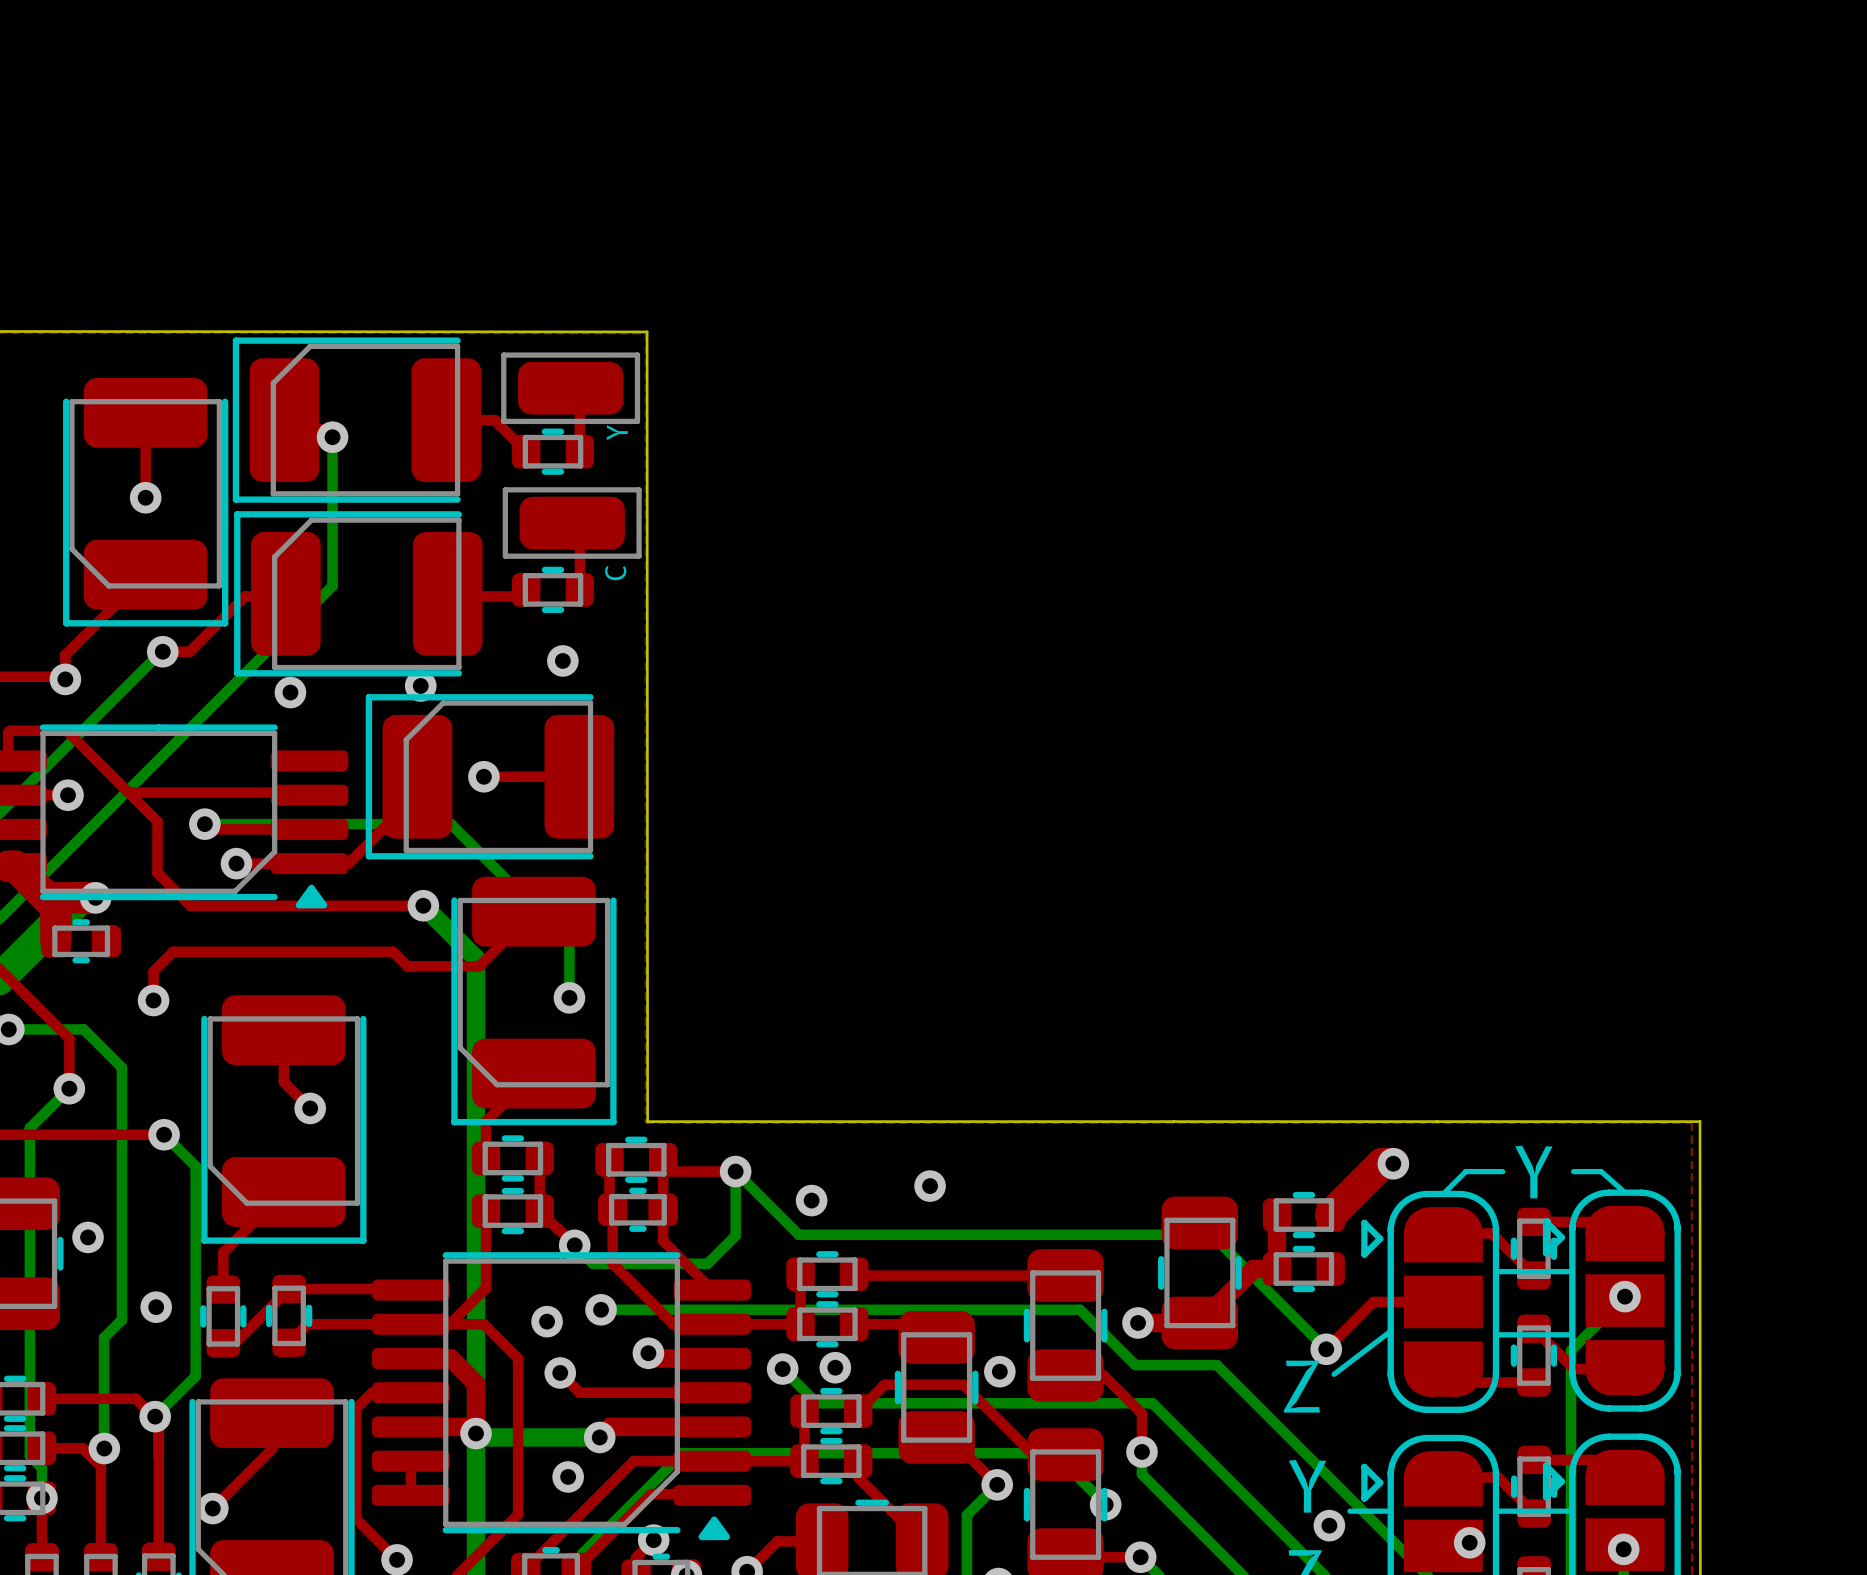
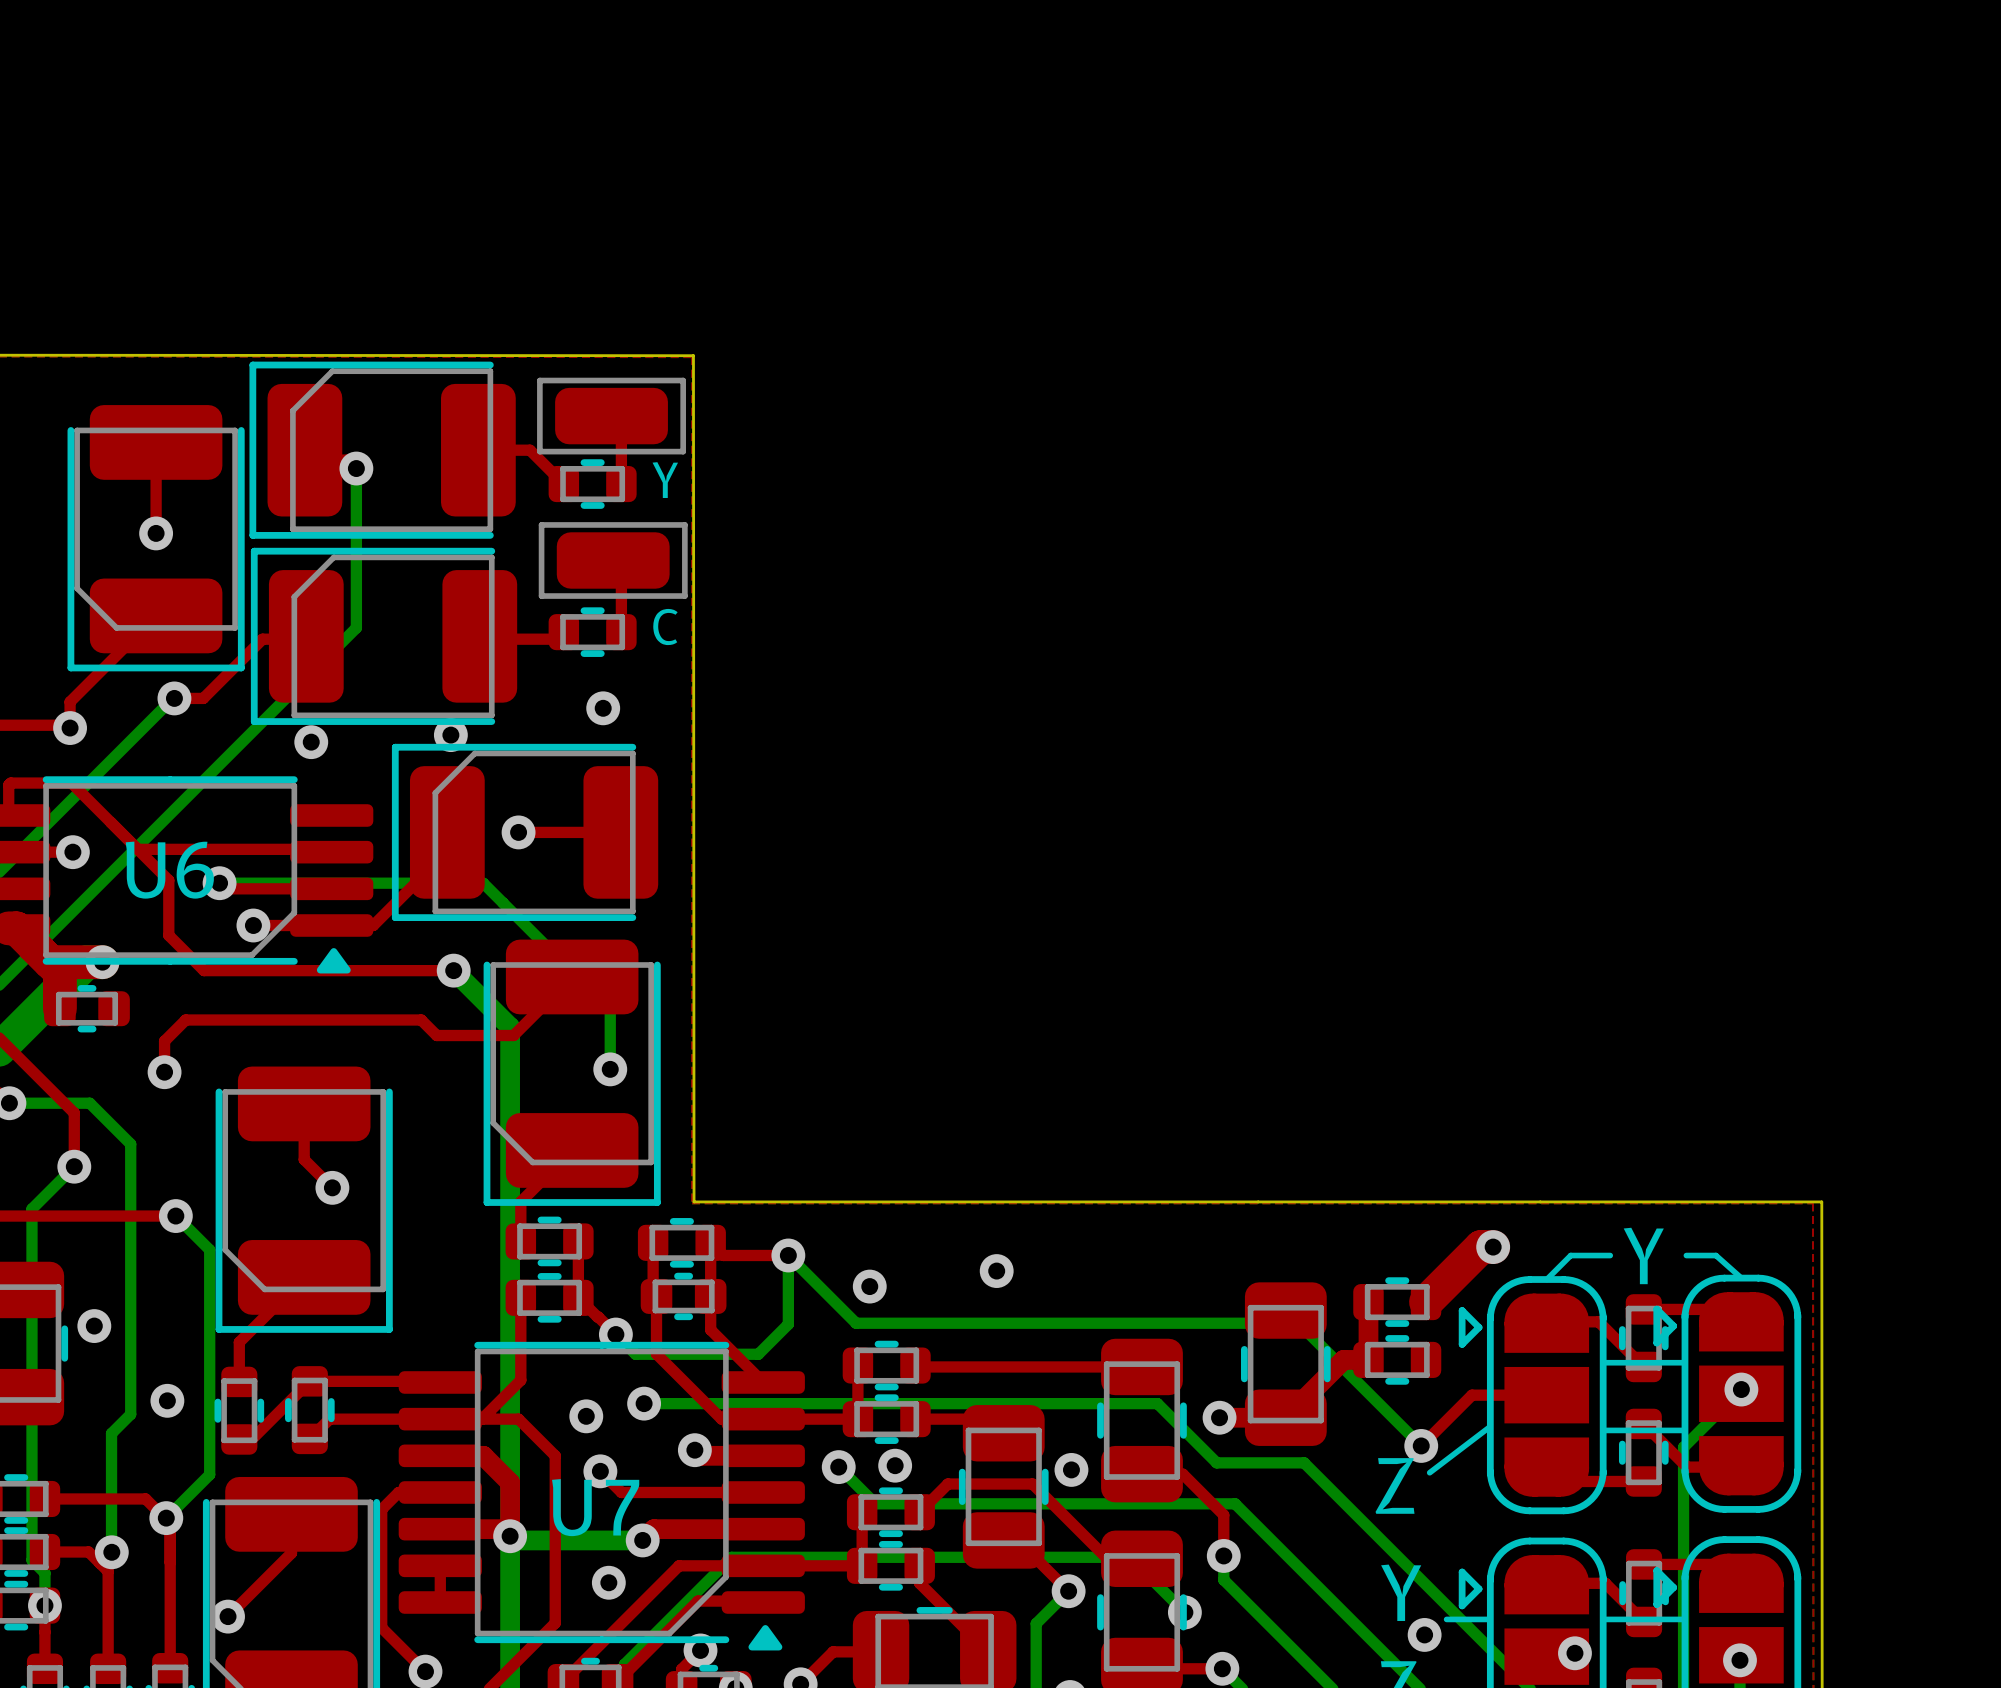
text rotation: 0° (617, 432) -> 90° clockwise (665, 480)
text rotation: 0° (615, 573) -> 90° clockwise (665, 627)
U6 name: none -> U6 (169, 870)
U7 name: none -> U7 (595, 1507)

